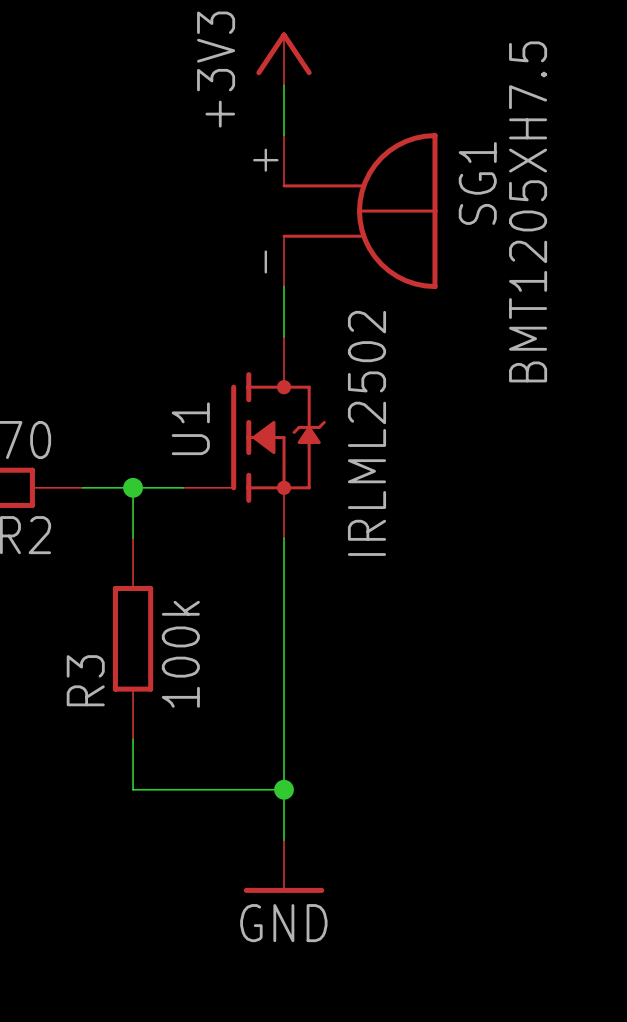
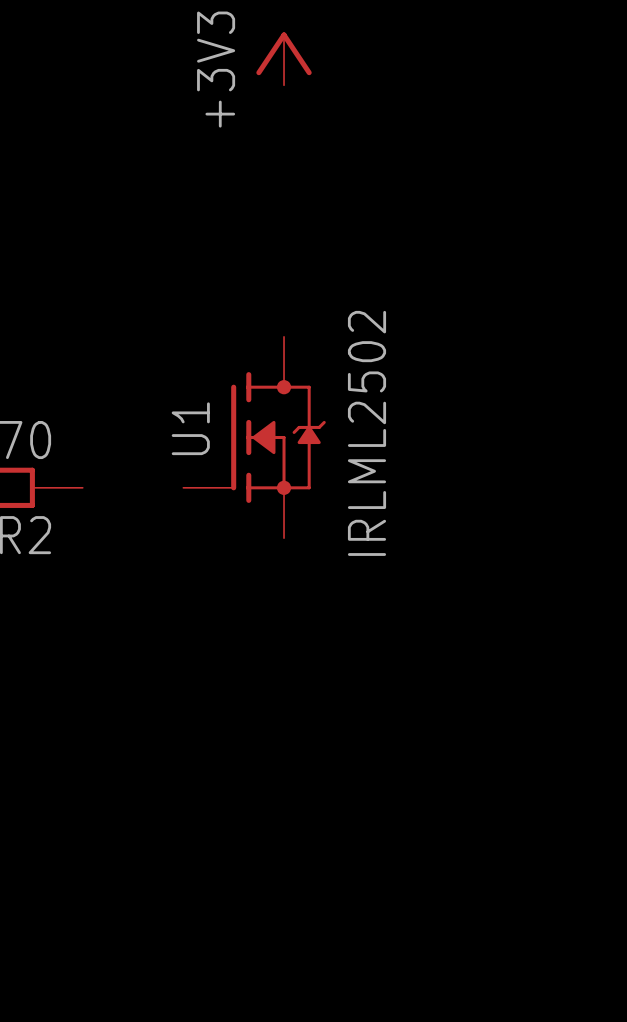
wire: (284, 85) (284, 135) -> none
SG1: BMT1205XH7.5 (360, 211) -> none
wire: (284, 286) (284, 336) -> none
wire: (82, 487) (183, 487) -> none
wire: (133, 487) (133, 538) -> none
junction: (133, 487) -> none
wire: (284, 538) (284, 840) -> none
R3: 100k (133, 638) -> none
wire: (133, 739) (133, 789) (284, 789) -> none
junction: (284, 789) -> none
power symbol: GND (284, 866) -> none

